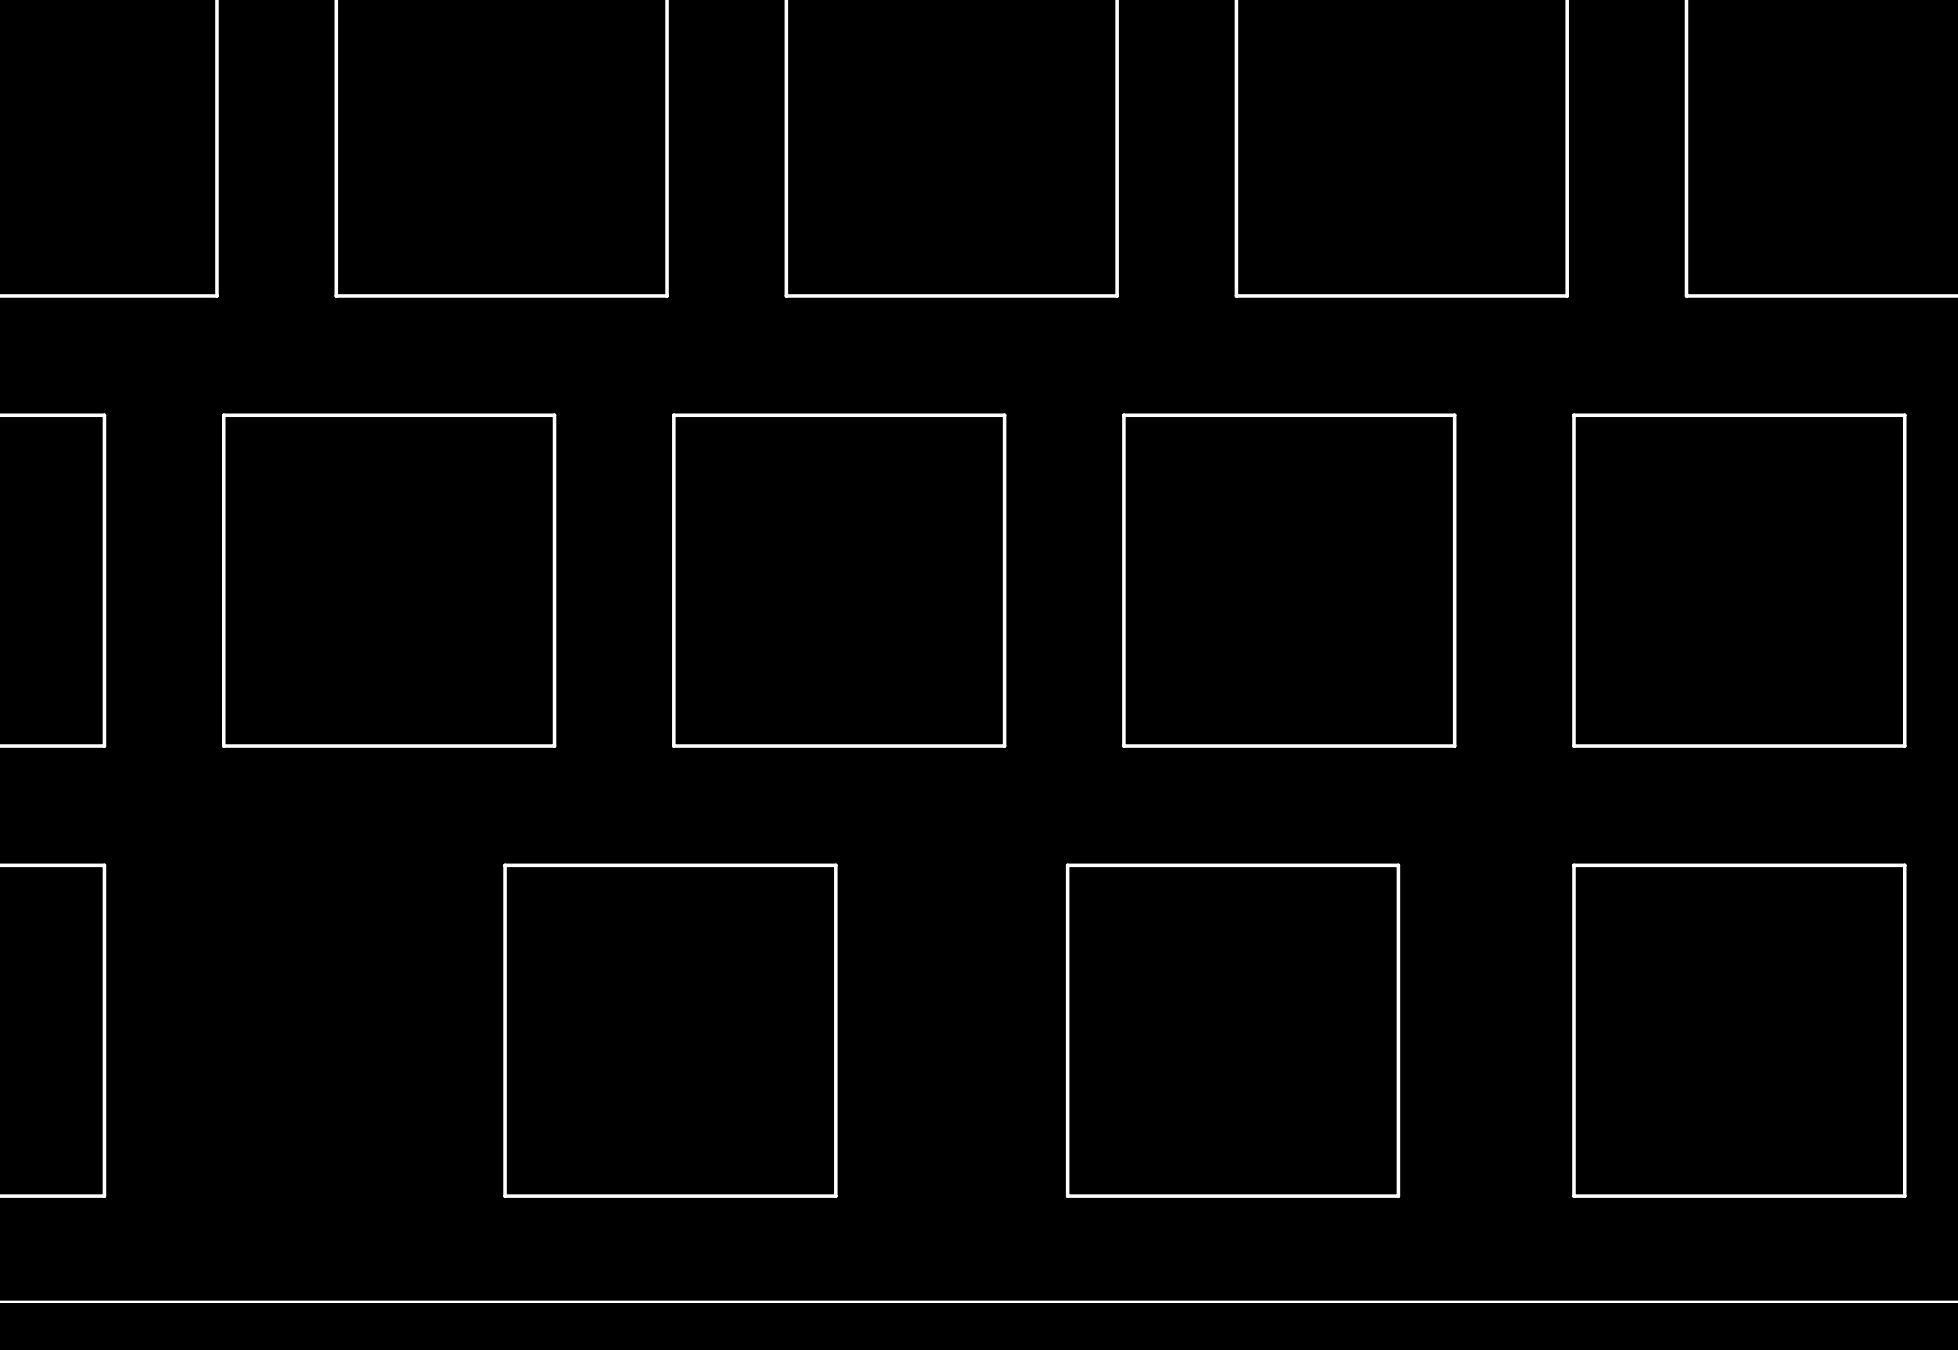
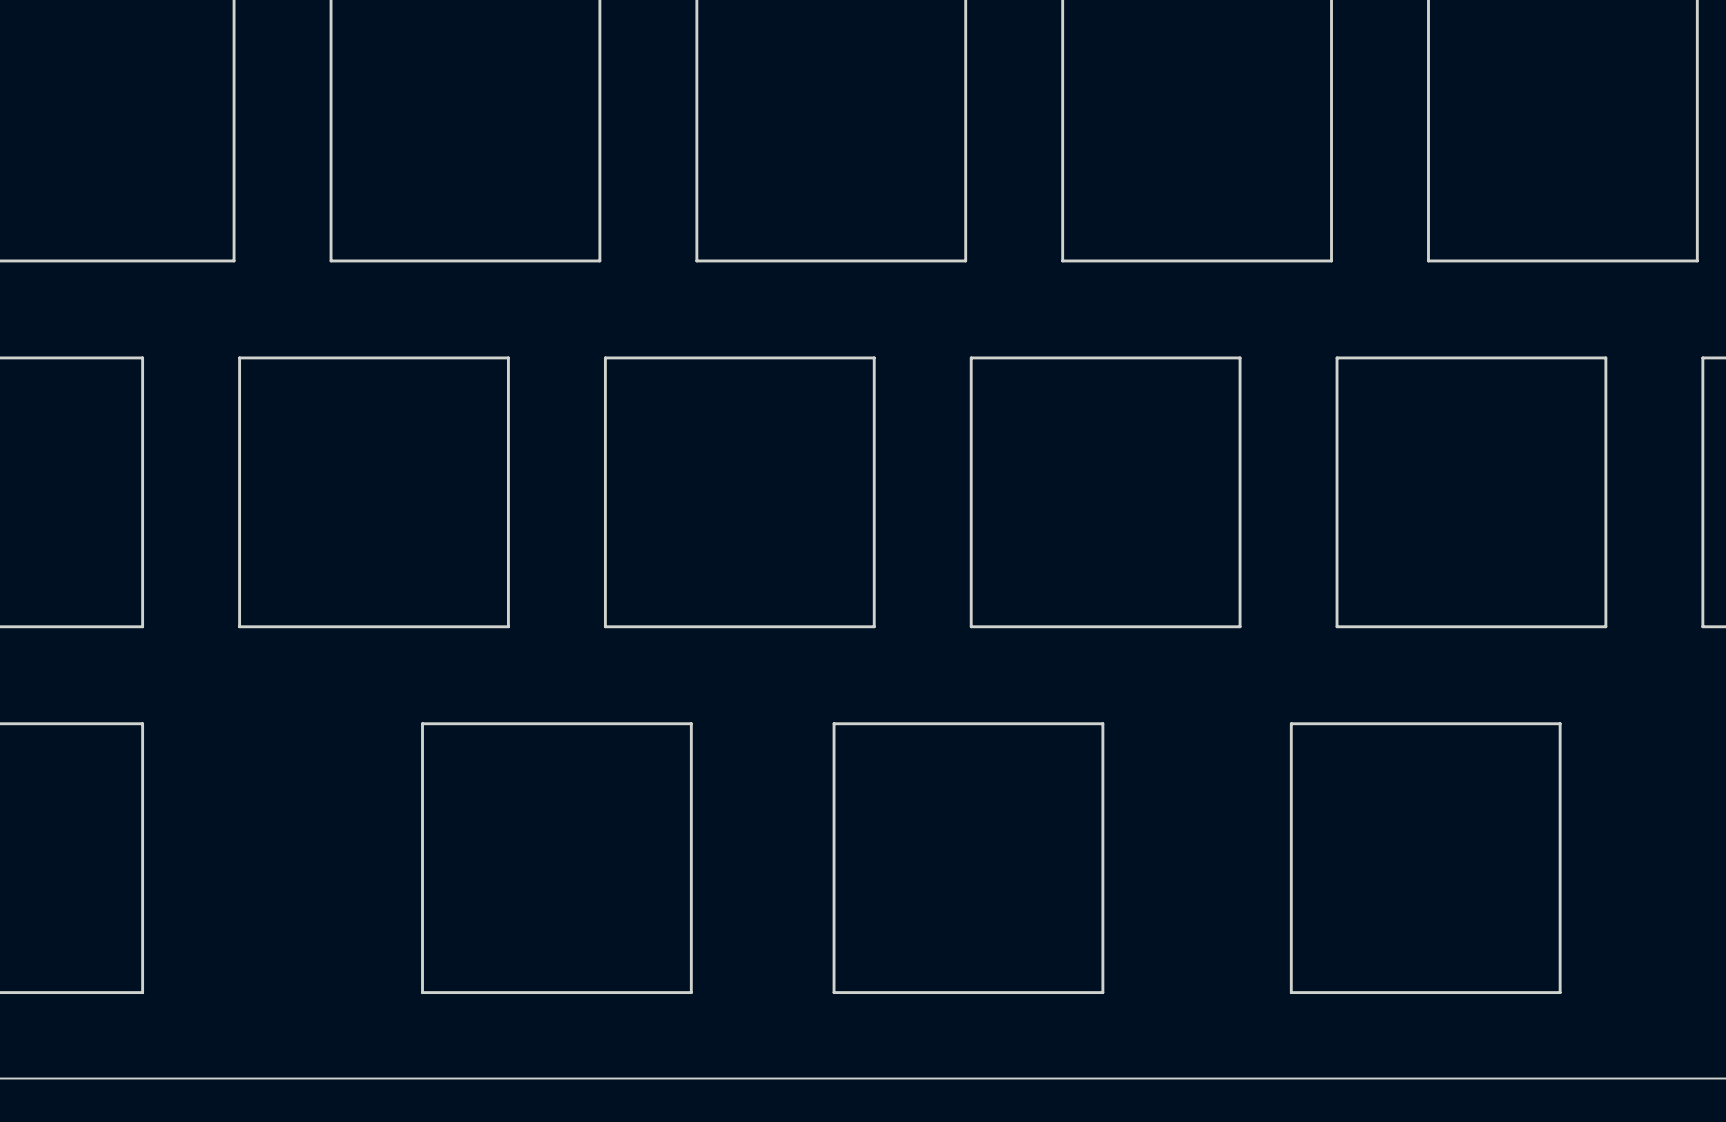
drawing position: (670, 1030) -> (556, 858)
drawing position: (1233, 1030) -> (968, 858)
drawing position: (1739, 1030) -> (1425, 858)

